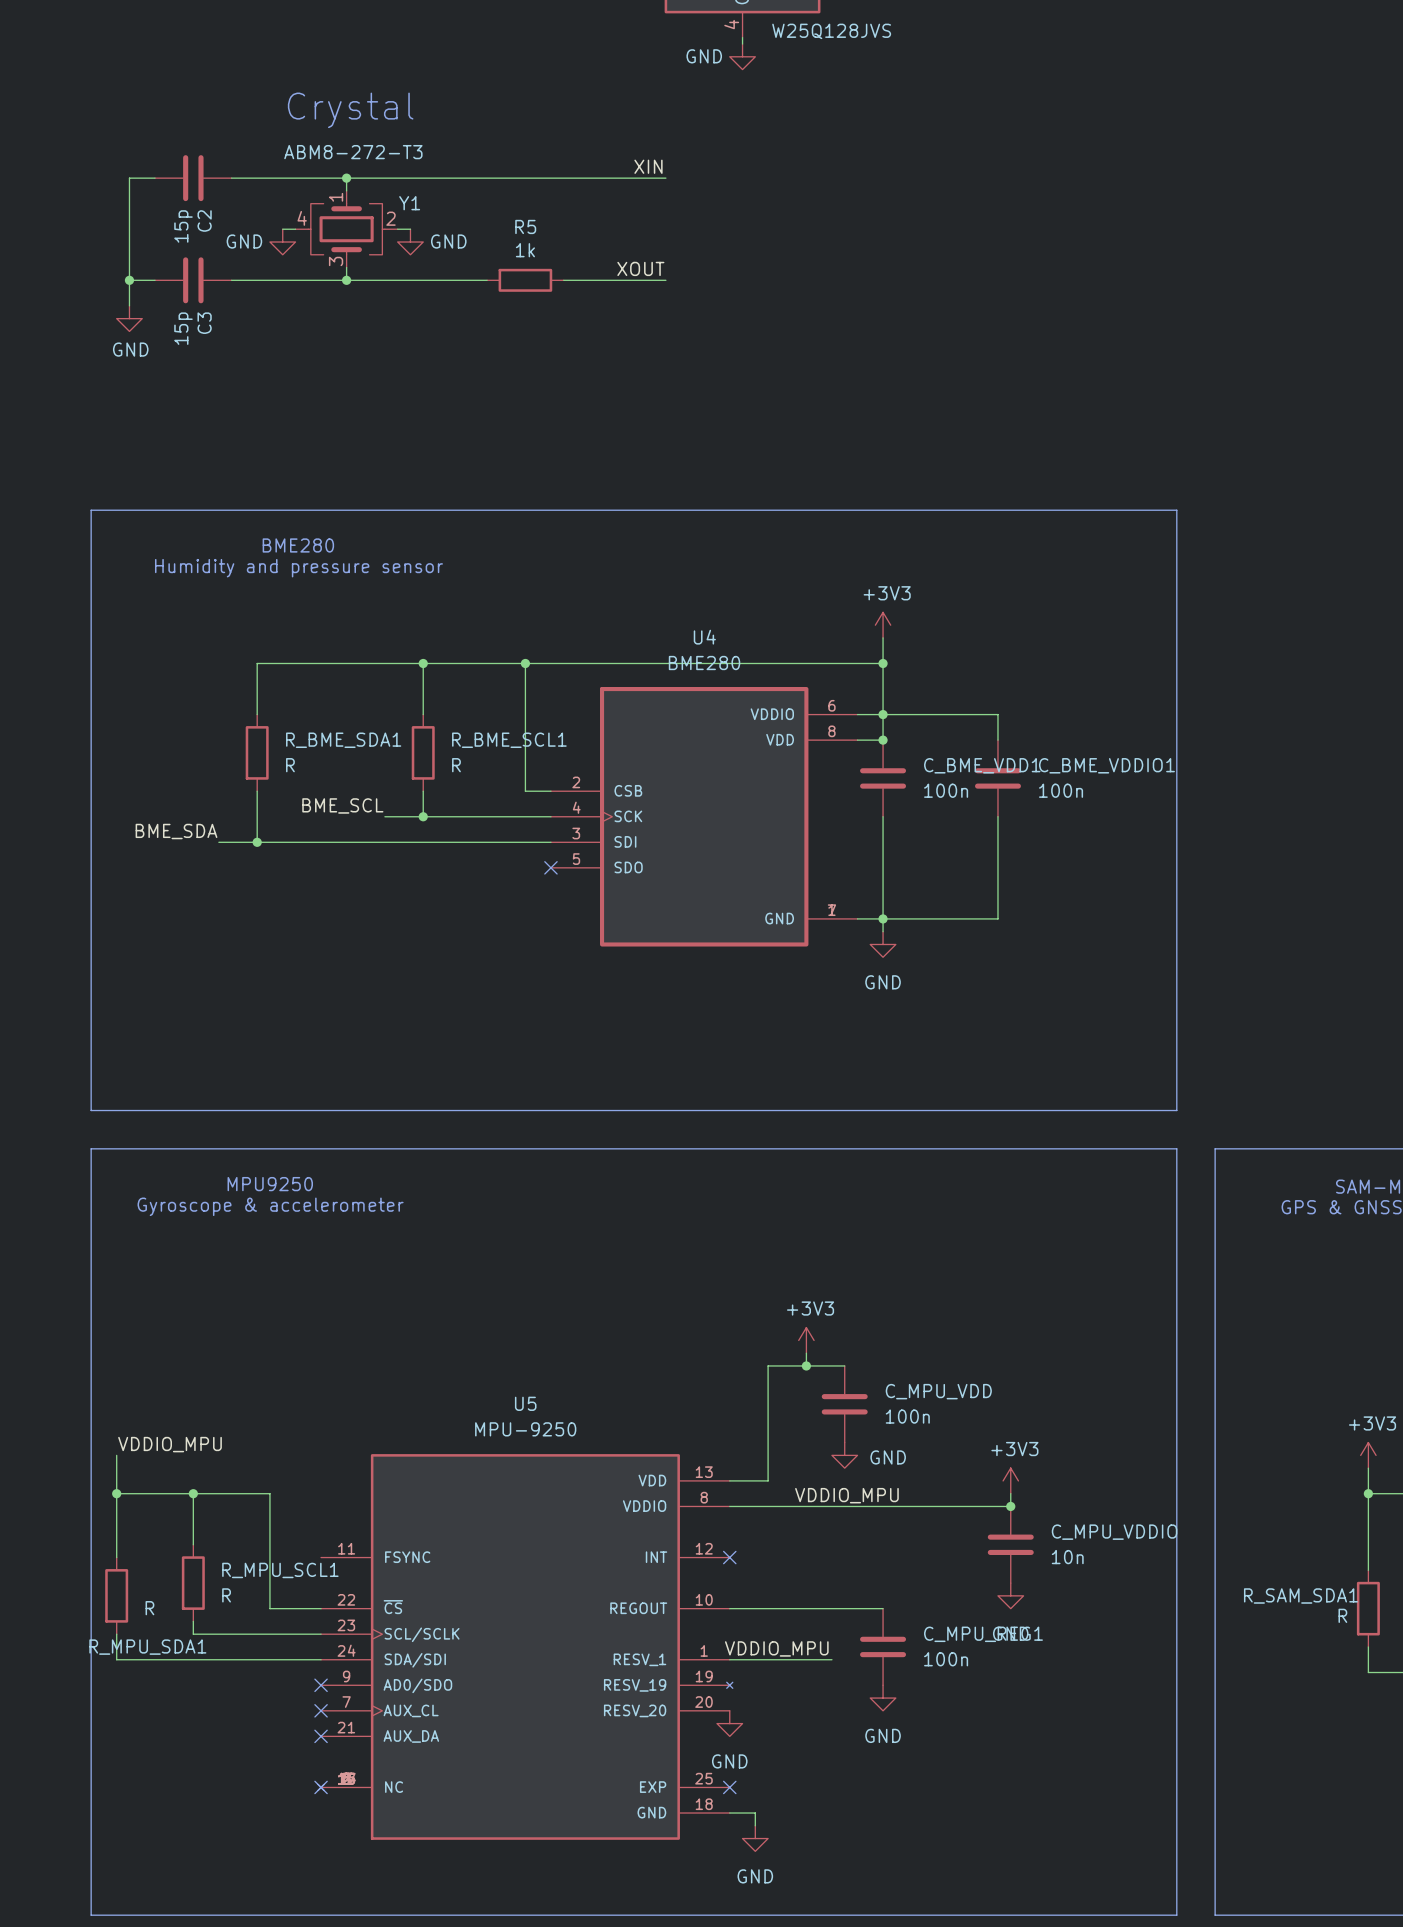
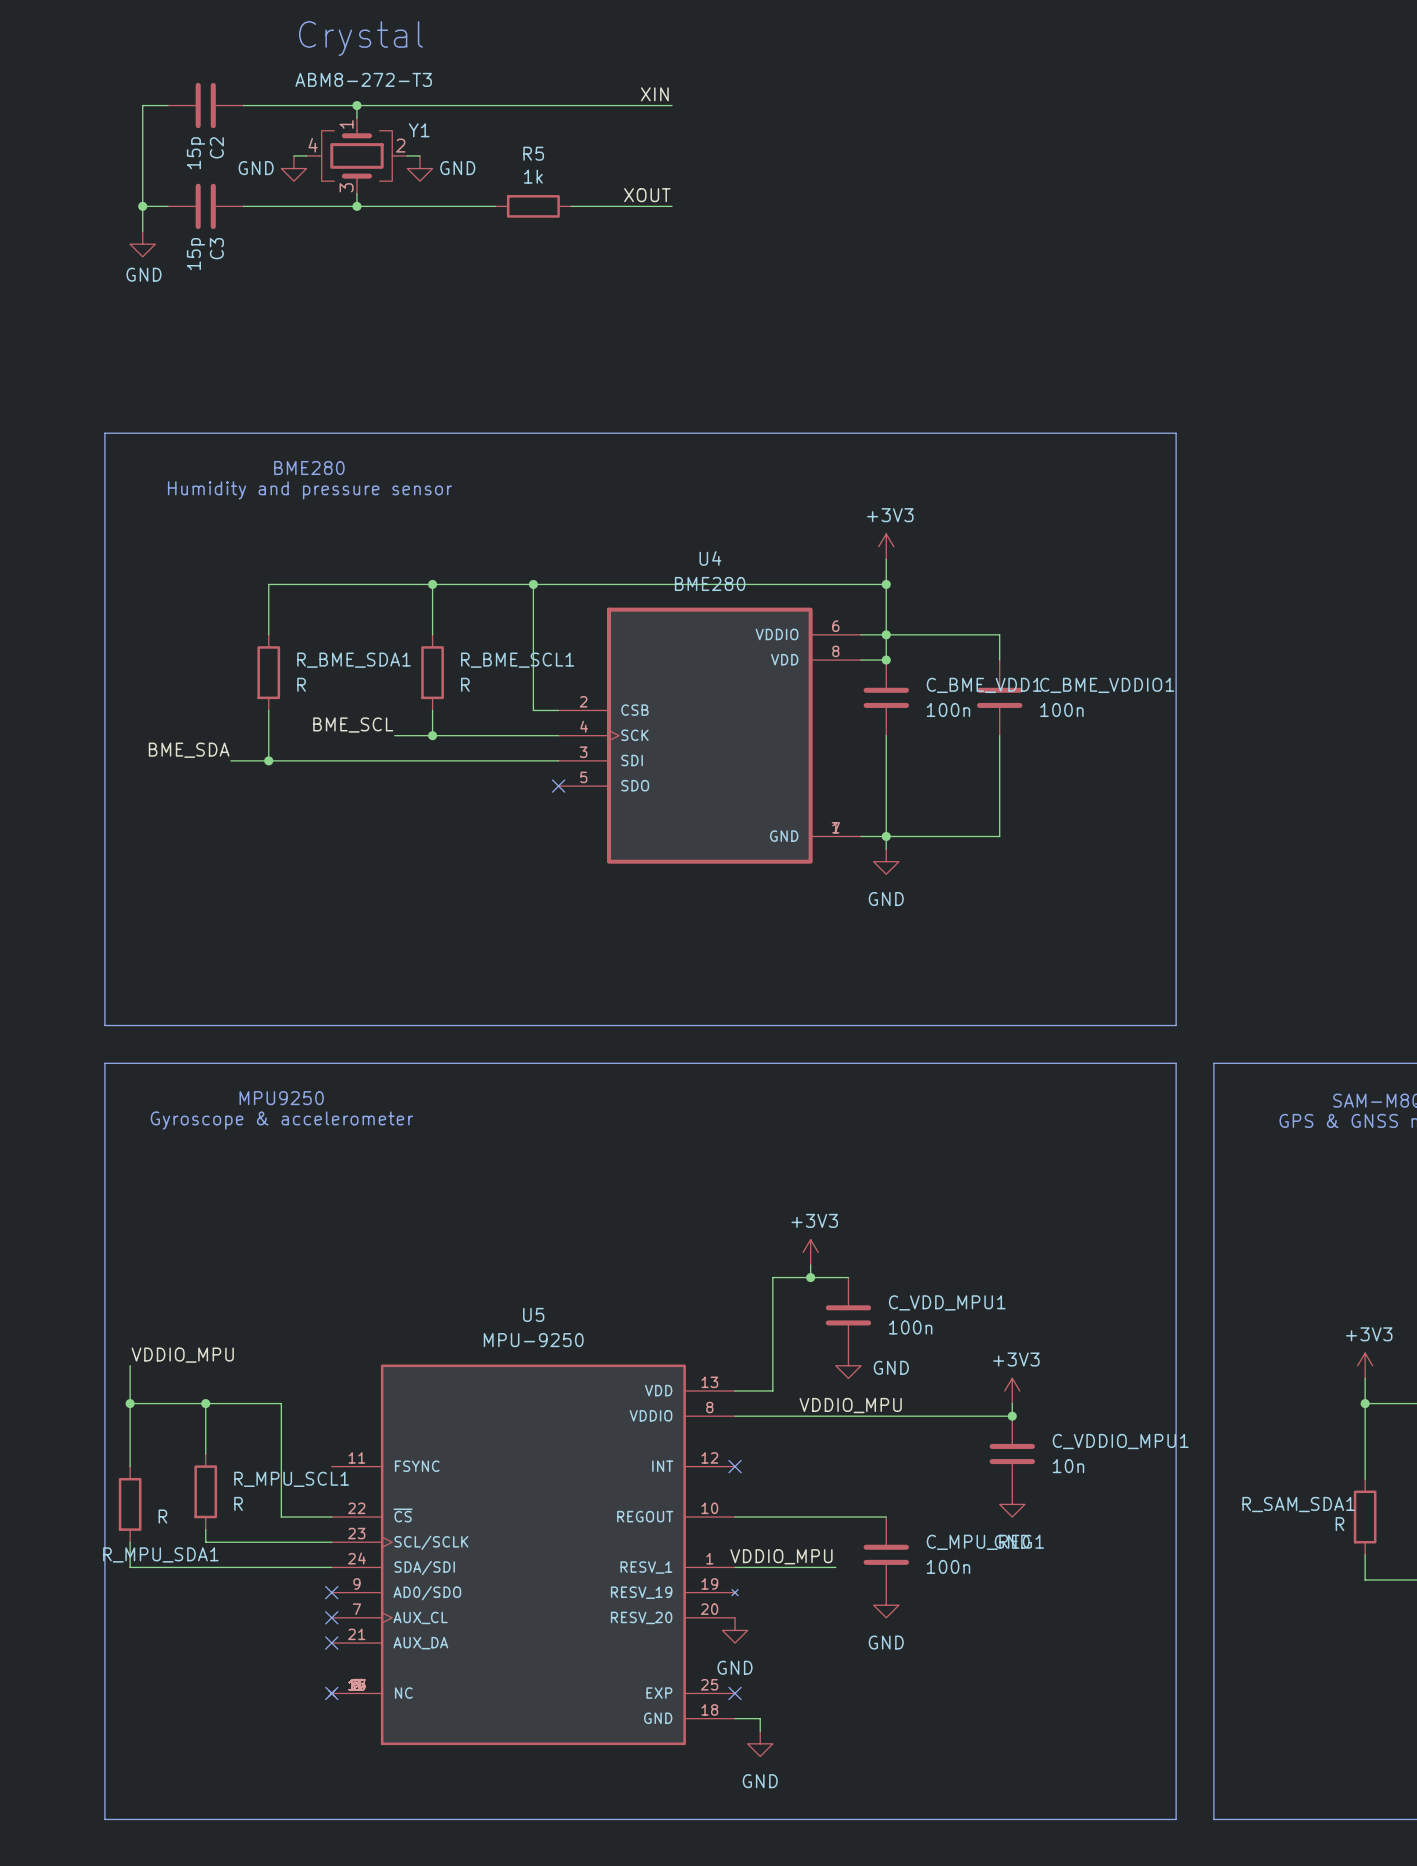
C_MPU_VDD name: C_MPU_VDD (938, 1391) -> C_VDD_MPU1 (947, 1302)
C_MPU_VDDIO name: C_MPU_VDDIO (1114, 1532) -> C_VDDIO_MPU1 (1120, 1441)

